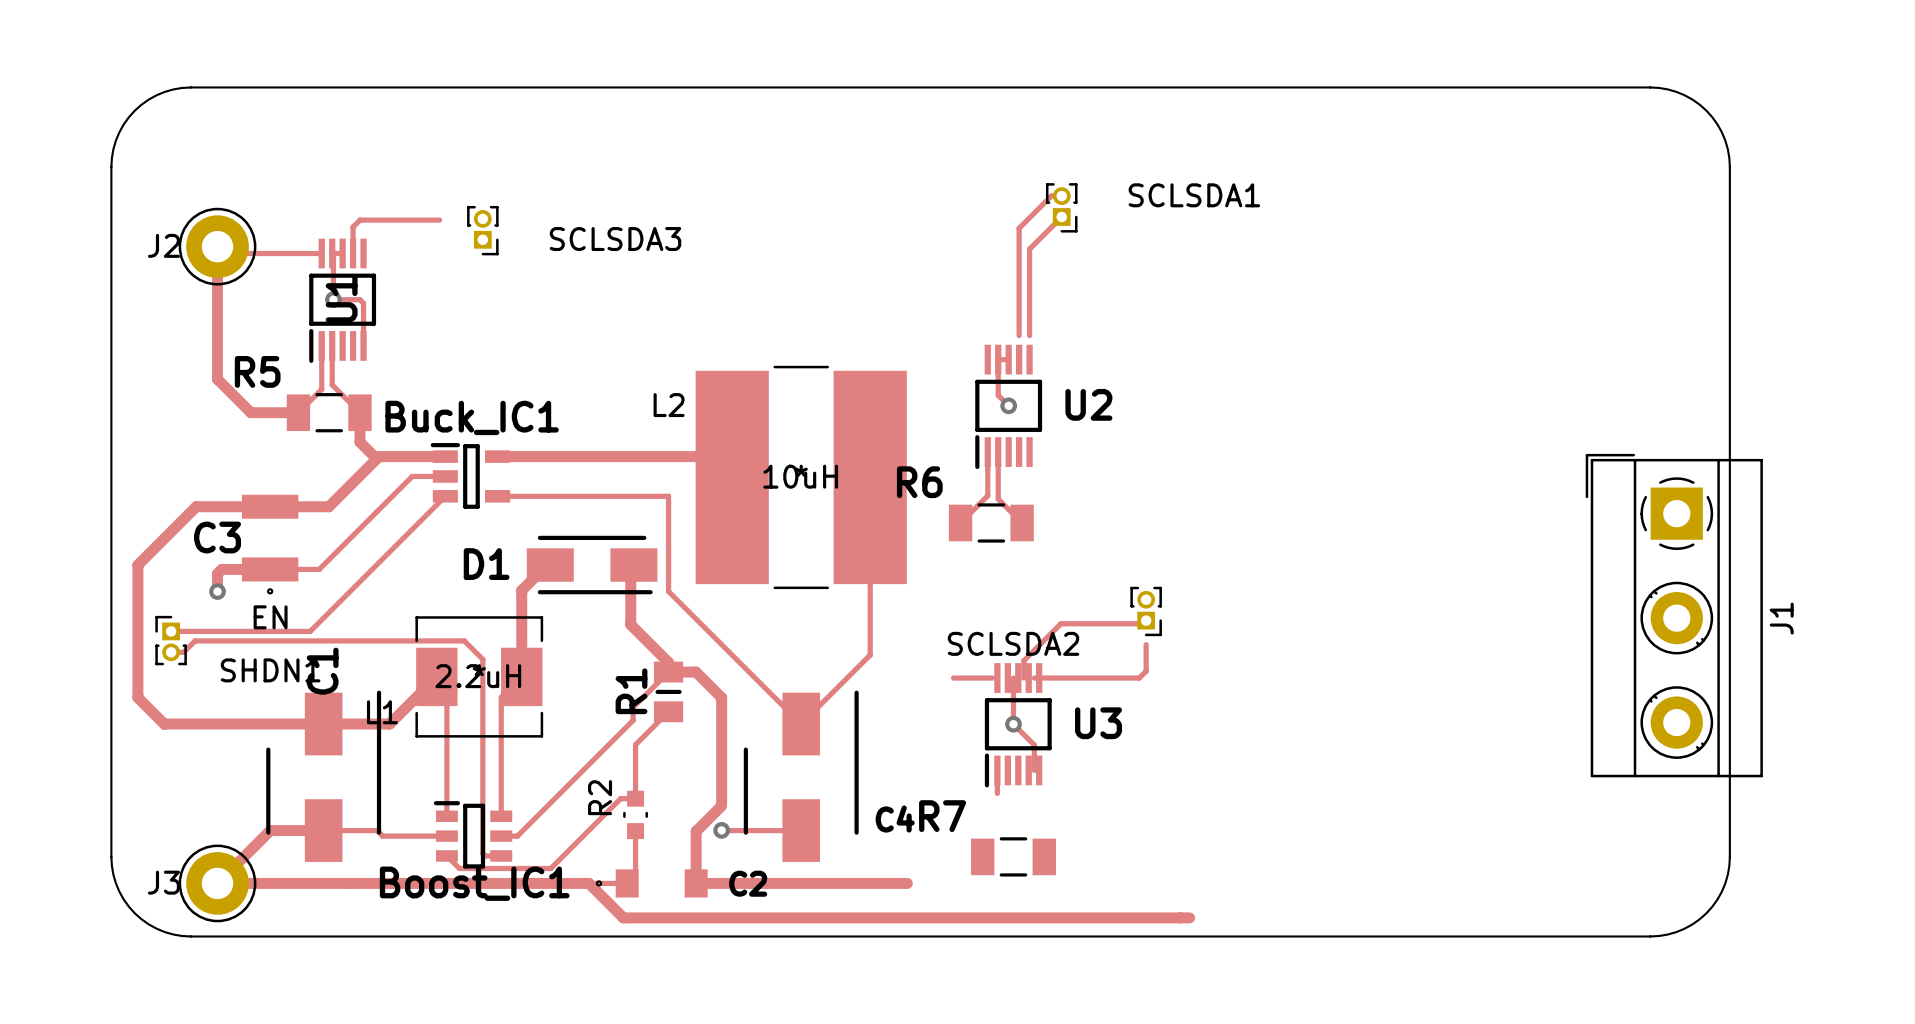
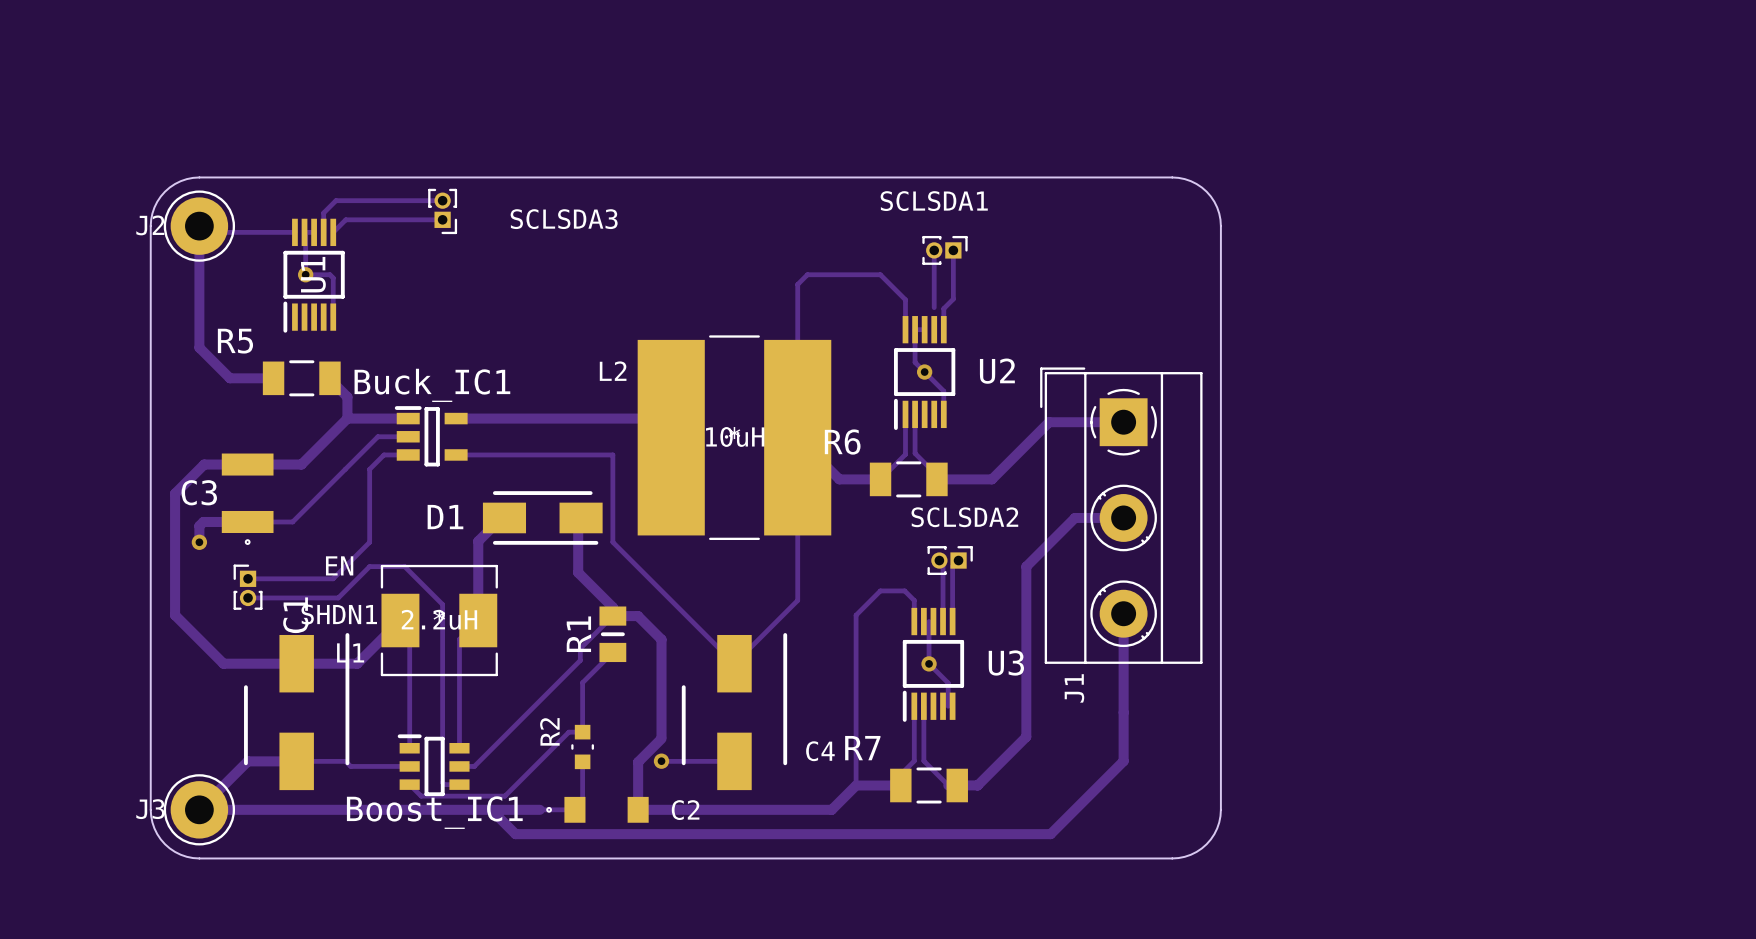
SCLSDA1 name position: SCLSDA1 (1194, 195) -> SCLSDA1 (934, 201)
track: (1061, 196) (1051, 196) (1019, 228) (1019, 273) -> none
SCLSDA1 rotation: 0° (1061, 207) -> 90° counterclockwise (944, 250)
SCLSDA1 position: (1061, 207) -> (944, 250)
track: (1061, 216) (1029, 249) (1029, 335) -> none
track: (439, 220) (359, 220) (353, 227) (353, 232) -> (442, 200) (335, 200) (323, 212)
track: none -> (442, 219) (345, 219) (333, 232)
track: none -> (953, 250) (953, 299) (943, 308) (943, 329)
track: (321, 345) (321, 389) (297, 412) -> none
track: (332, 345) (332, 384) (359, 412) (359, 442) (376, 458) -> none
track: none -> (905, 329) (905, 299) (880, 274) (807, 274) (797, 284) (797, 437) (839, 479) (880, 479)
track: none -> (924, 372) (943, 391) (943, 414)
track: none -> (328, 378) (347, 397) (347, 418)
track: (998, 494) (998, 499) (1022, 522) -> (915, 453) (936, 475) (936, 479) (991, 479) (1049, 422) (1123, 422)
track: (445, 496) (310, 631) -> (408, 454) (384, 454) (369, 469) (369, 542) (333, 578) (284, 578)
track: (222, 506) (196, 506) (137, 565) (137, 697) (164, 724) -> (204, 464) (175, 493) (175, 615) (223, 663)
track: none -> (1123, 517) (1074, 517) (1026, 566) (1026, 736) (977, 785)
track: none -> (939, 560) (943, 564) (943, 621)
track: none -> (958, 560) (952, 566) (952, 621)
SCLSDA2 rotation: 0° (1146, 611) -> 90° counterclockwise (950, 560)
SCLSDA2 position: (1146, 611) -> (950, 560)
J1 position: (1674, 615) -> (1121, 515)
J1 name position: J1 (1781, 618) -> J1 (1074, 688)
track: (1146, 623) (1060, 623) (1023, 660) (1023, 678) -> none
track: (171, 631) (270, 631) -> none
SHDN1 position: (171, 640) -> (248, 587)
track: (464, 640) (195, 640) (183, 652) (171, 652) -> (425, 587) (404, 566) (369, 566) (338, 597) (248, 597)
SCLSDA2 name position: SCLSDA2 (1013, 643) -> SCLSDA2 (964, 517)
track: (1146, 644) (1146, 671) (1139, 678) (1034, 678) -> none
track: none -> (1123, 613) (1123, 761) (1050, 834) (515, 834) (491, 809)
track: (953, 678) (992, 678) -> (856, 785) (891, 785)
track: none -> (914, 621) (914, 600) (904, 590) (880, 590) (856, 615) (856, 785)
track: (164, 724) (243, 724) -> none
track: none -> (923, 706) (923, 761) (948, 785) (977, 785)
track: none -> (914, 727) (914, 760) (891, 785)
track: none -> (856, 785) (831, 809)
track: (588, 883) (623, 917) (1189, 917) -> none
board edge: (217, 936) (173, 934) (148, 924) (134, 913) (123, 899) (115, 883) (111, 865) (111, 167) (115, 140) (123, 124) (134, 110) (148, 99) (173, 89) (190, 87) (1650, 87) (1667, 89) (1684, 95) (1699, 104) (1717, 124) (1727, 149) (1729, 167) (1729, 856) (1727, 874) (1721, 891) (1712, 906) (1699, 919) (1676, 932) (1659, 935) (1278, 936) -> (199, 858) (180, 854) (165, 844) (154, 828) (150, 809) (151, 219) (157, 201) (169, 187) (186, 179) (199, 177) (1172, 177) (1184, 179) (1201, 187) (1214, 201) (1219, 213) (1220, 226) (1220, 809) (1217, 828) (1206, 844) (1190, 854) (1172, 858)

